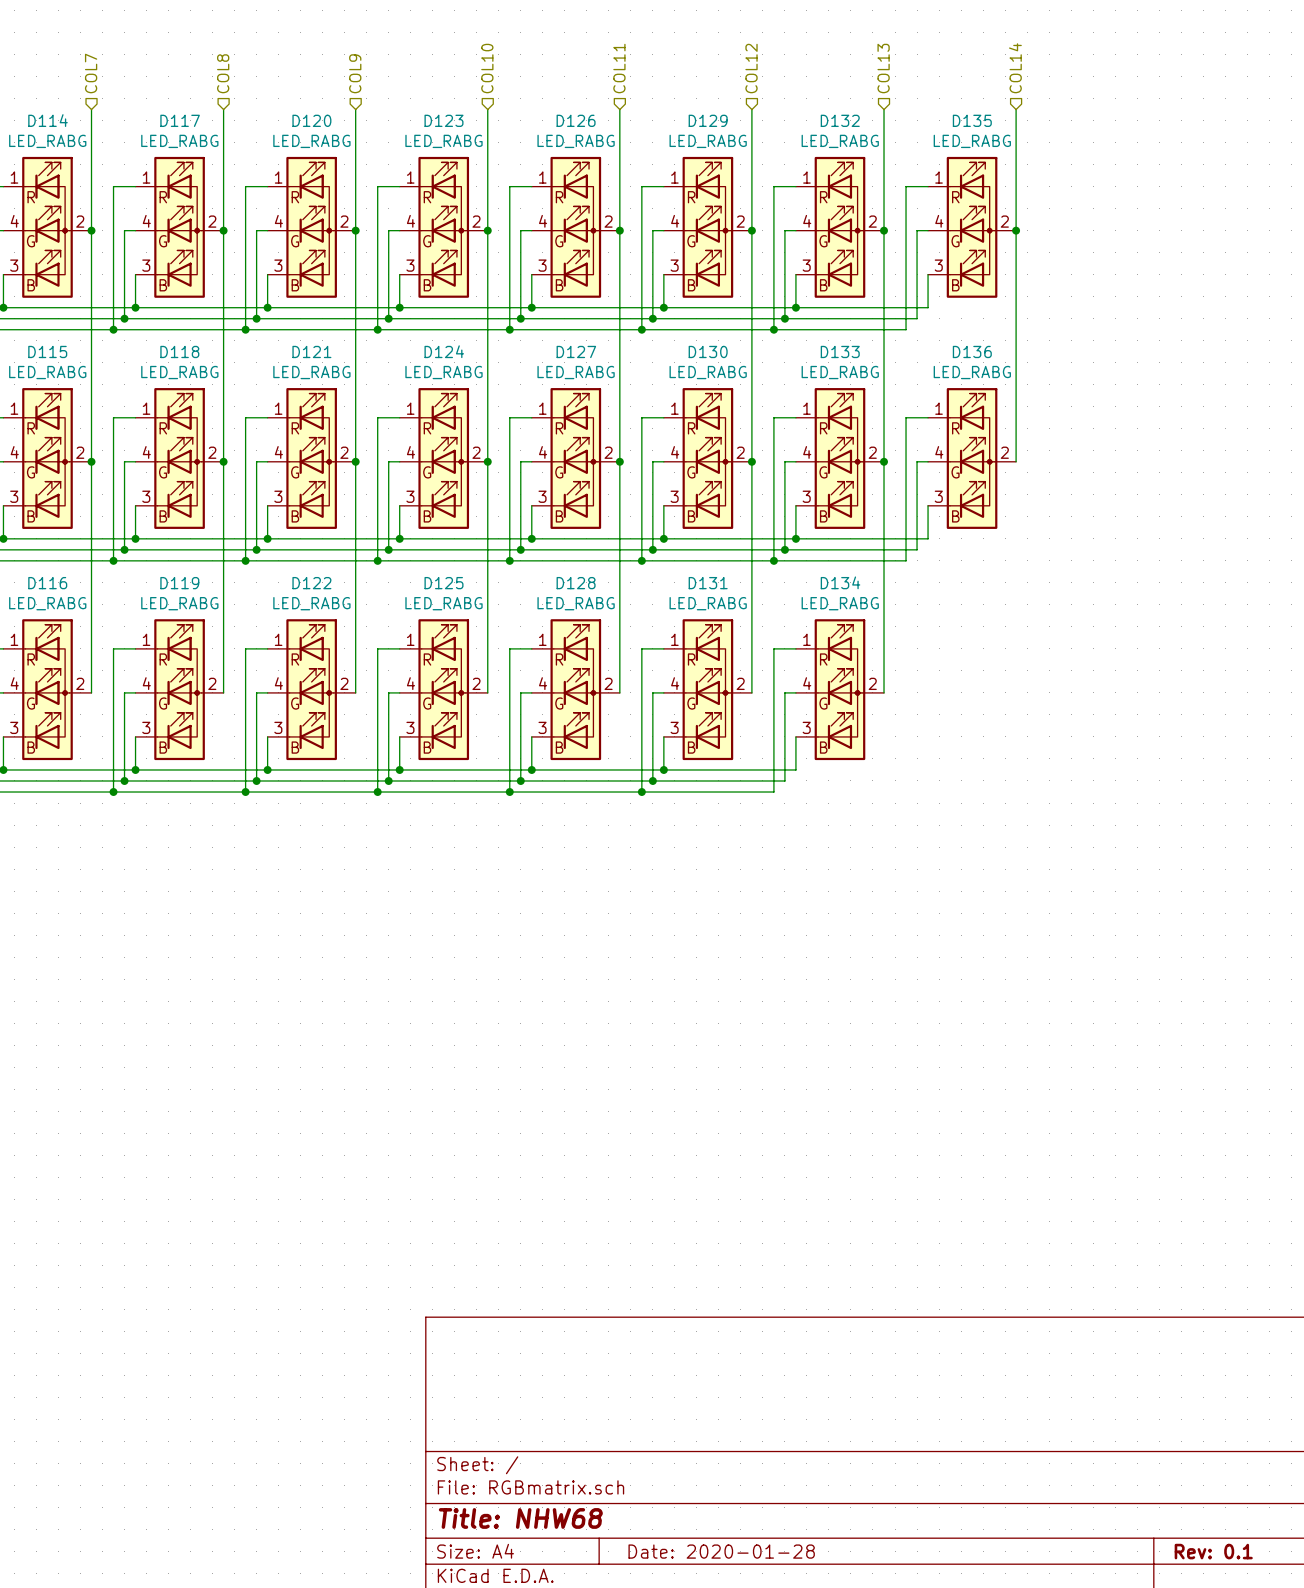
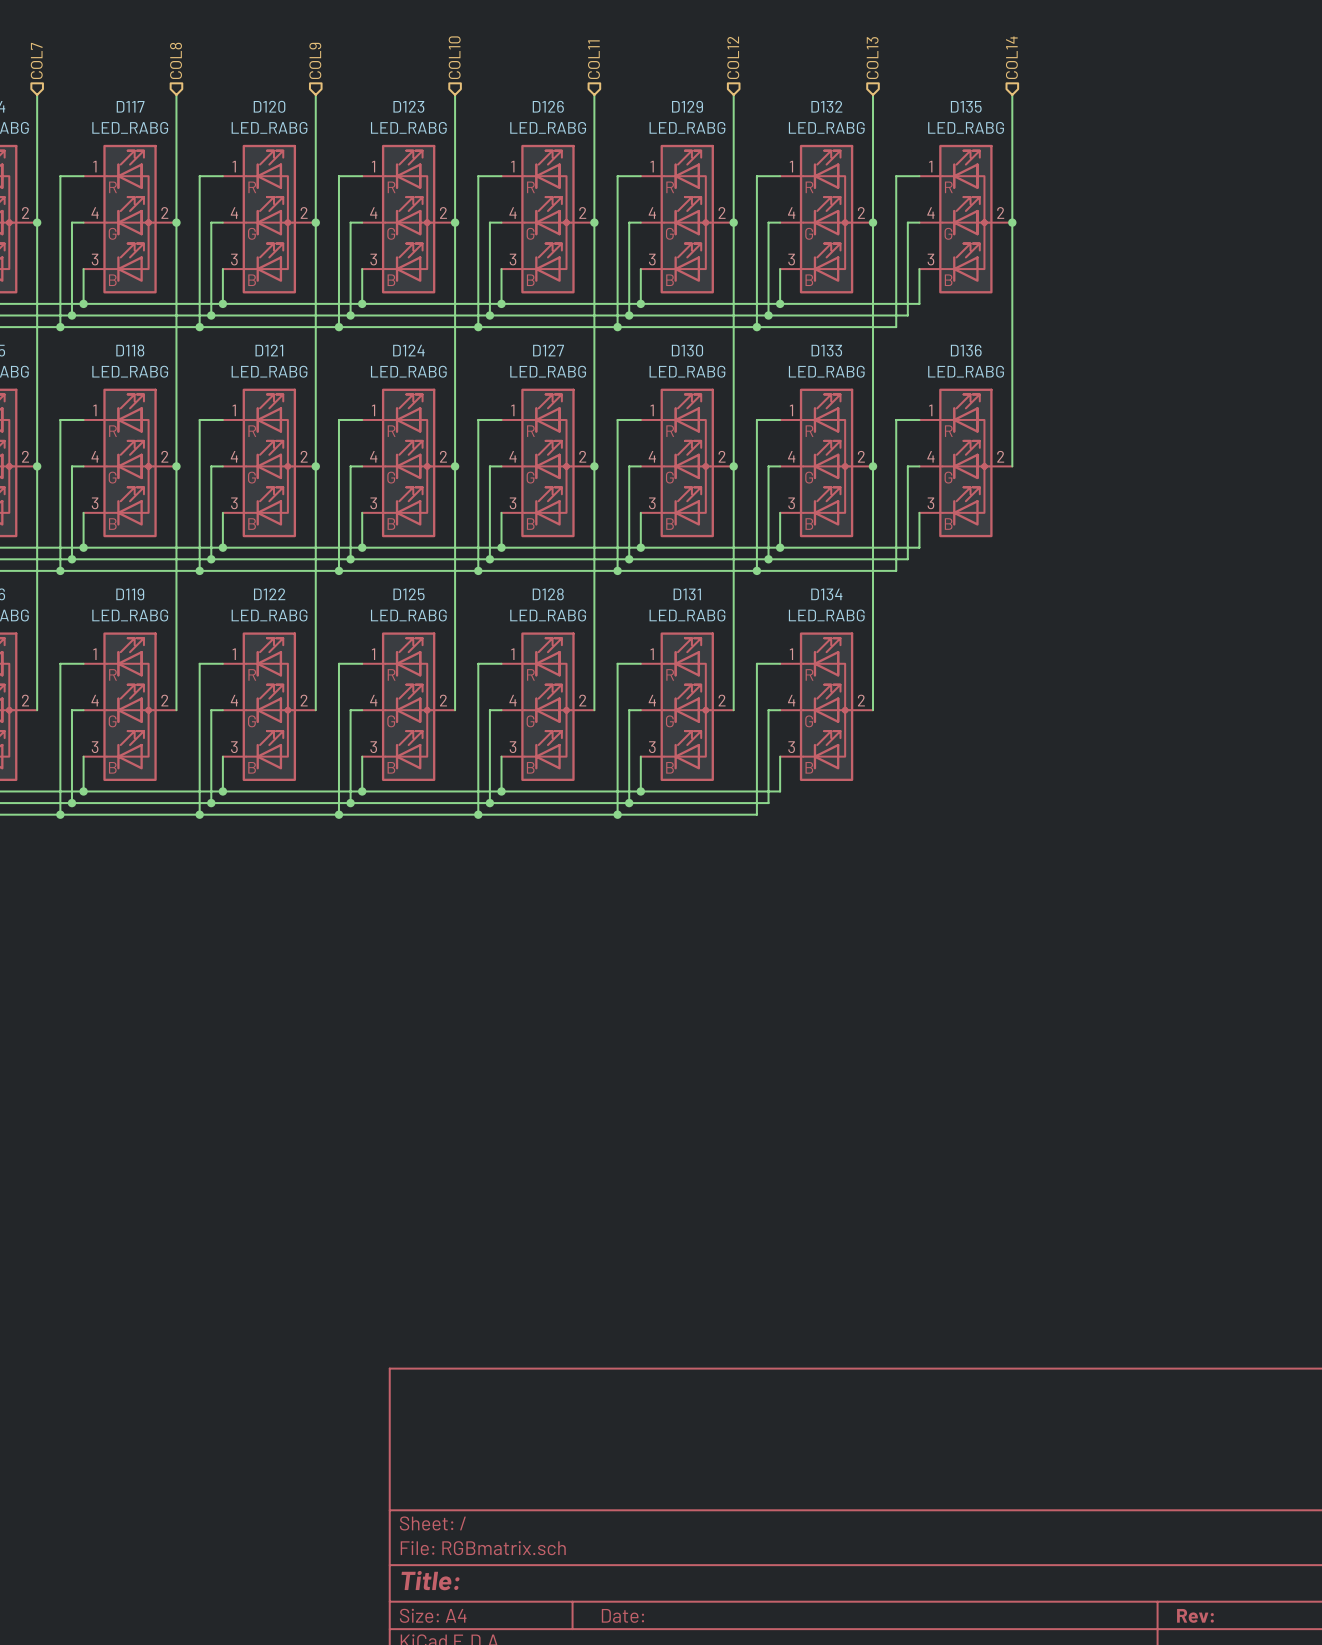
title block: Title: NHW68 (520, 1518) -> Title: (430, 1580)
title block: Date: 2020-01-28 (721, 1551) -> Date: (622, 1615)
title block: Rev: 0.1 (1213, 1551) -> Rev: (1195, 1615)

